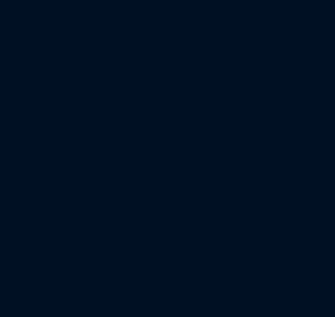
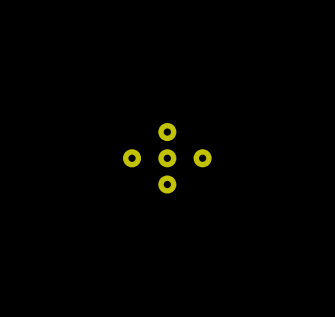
part: none -> (167, 158)

